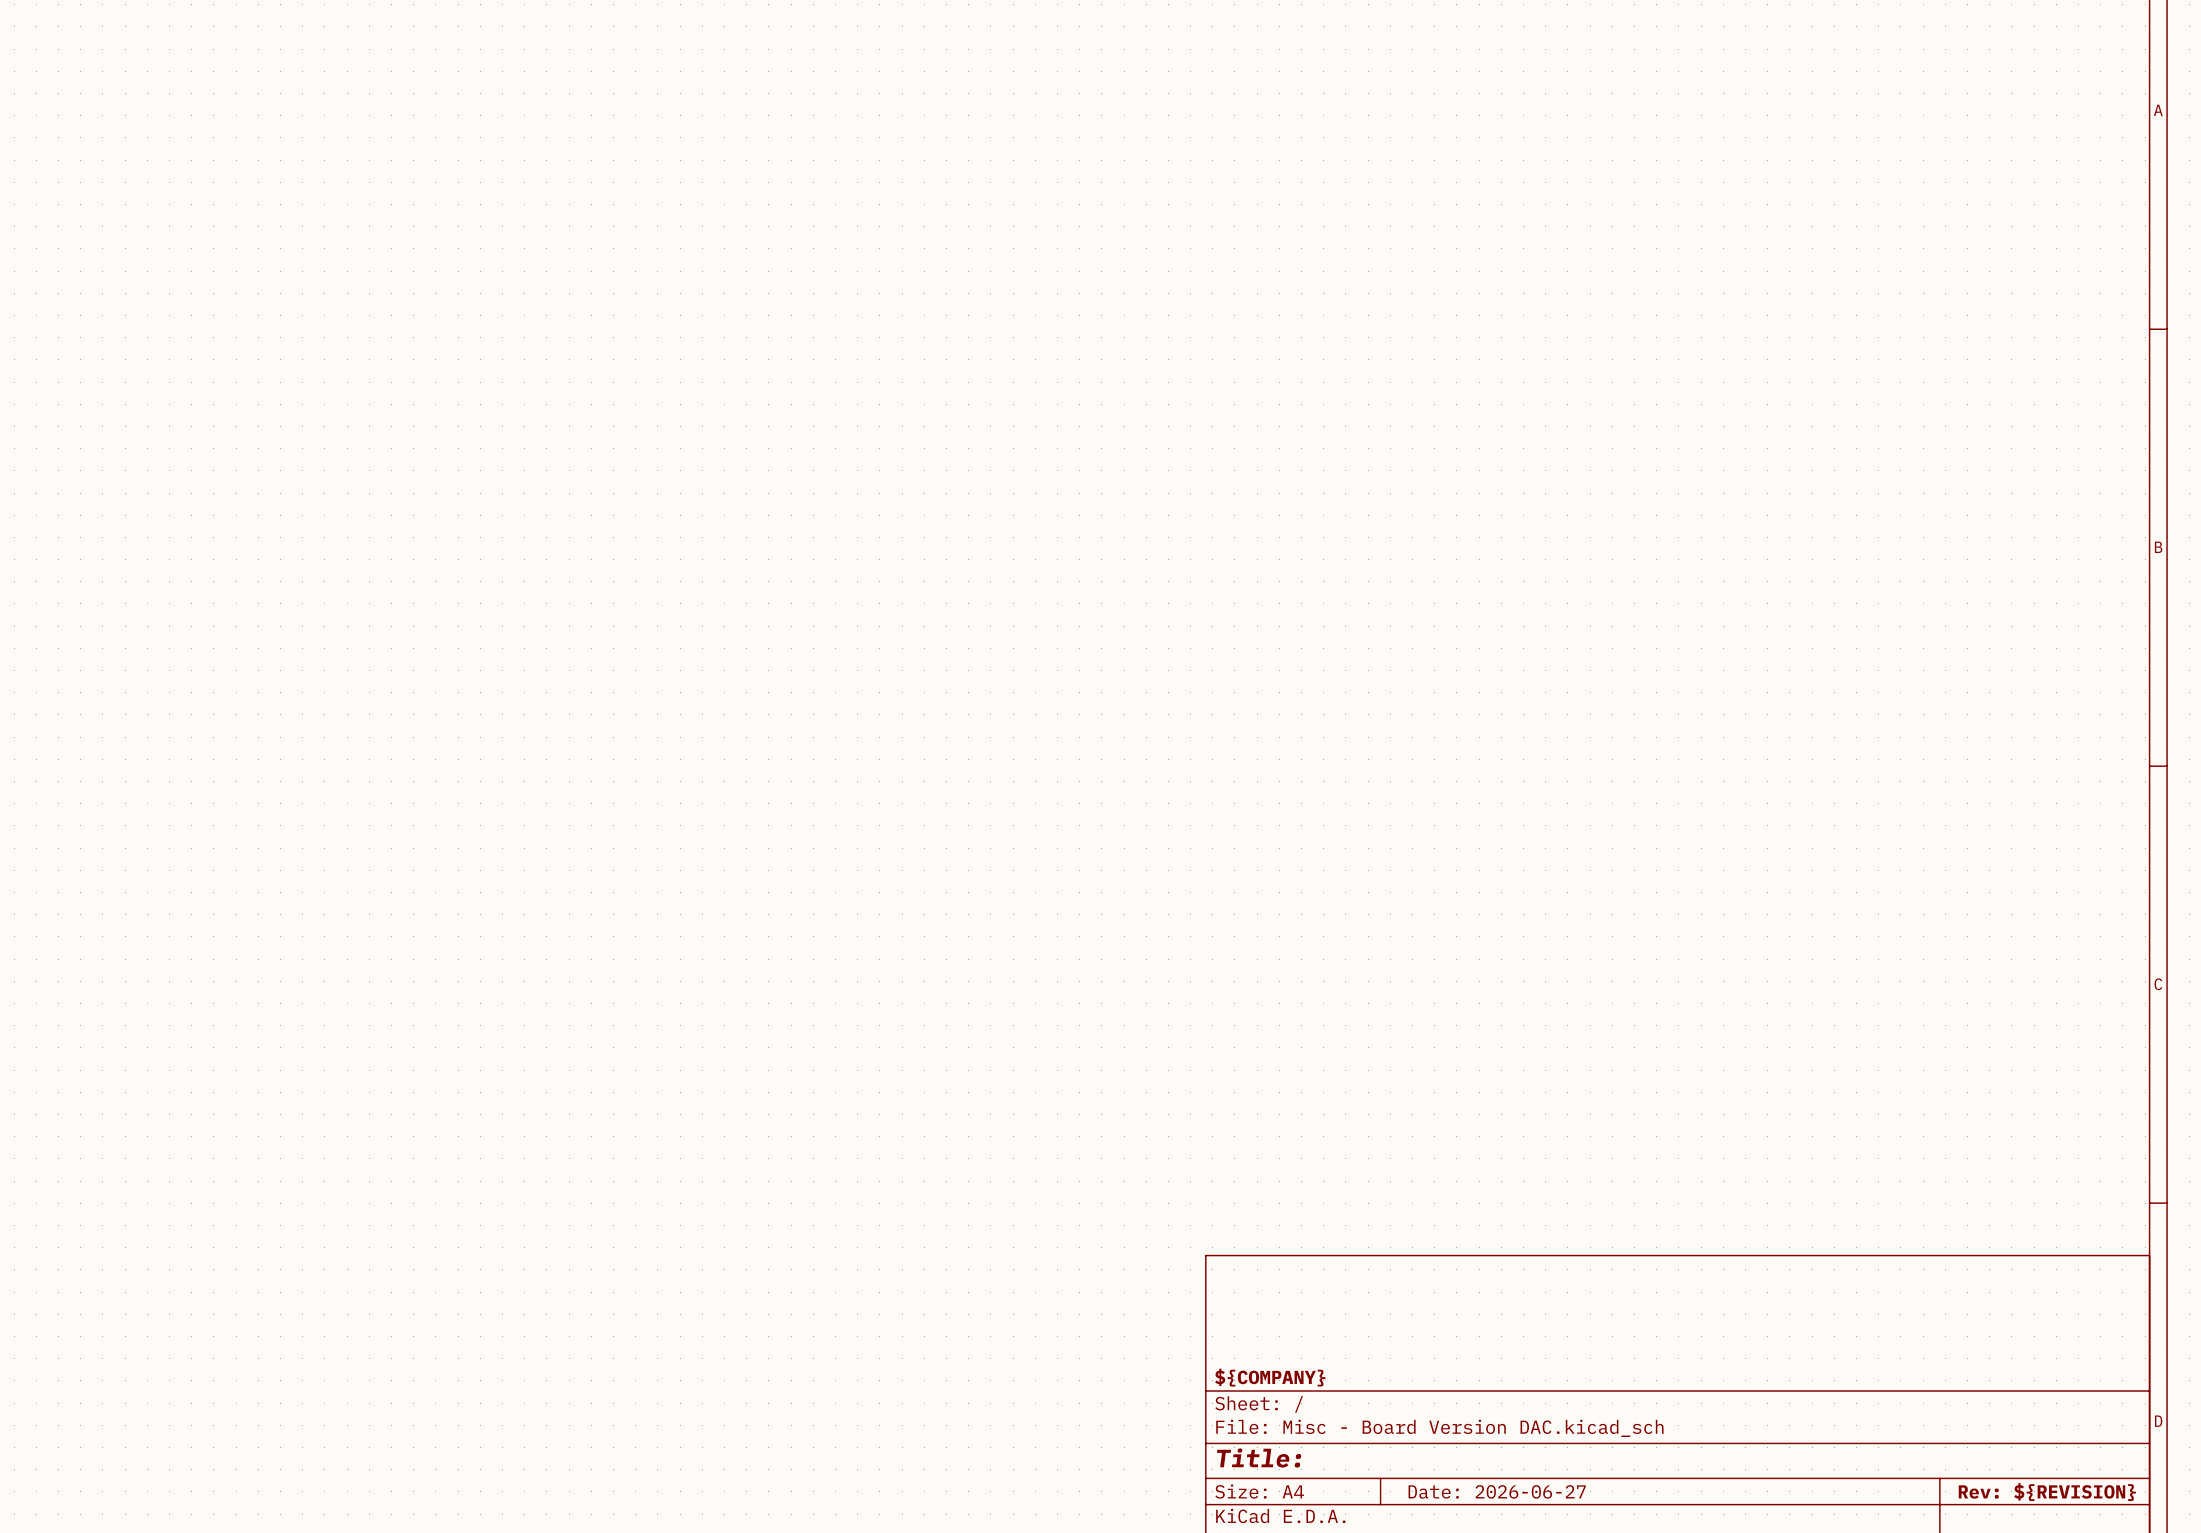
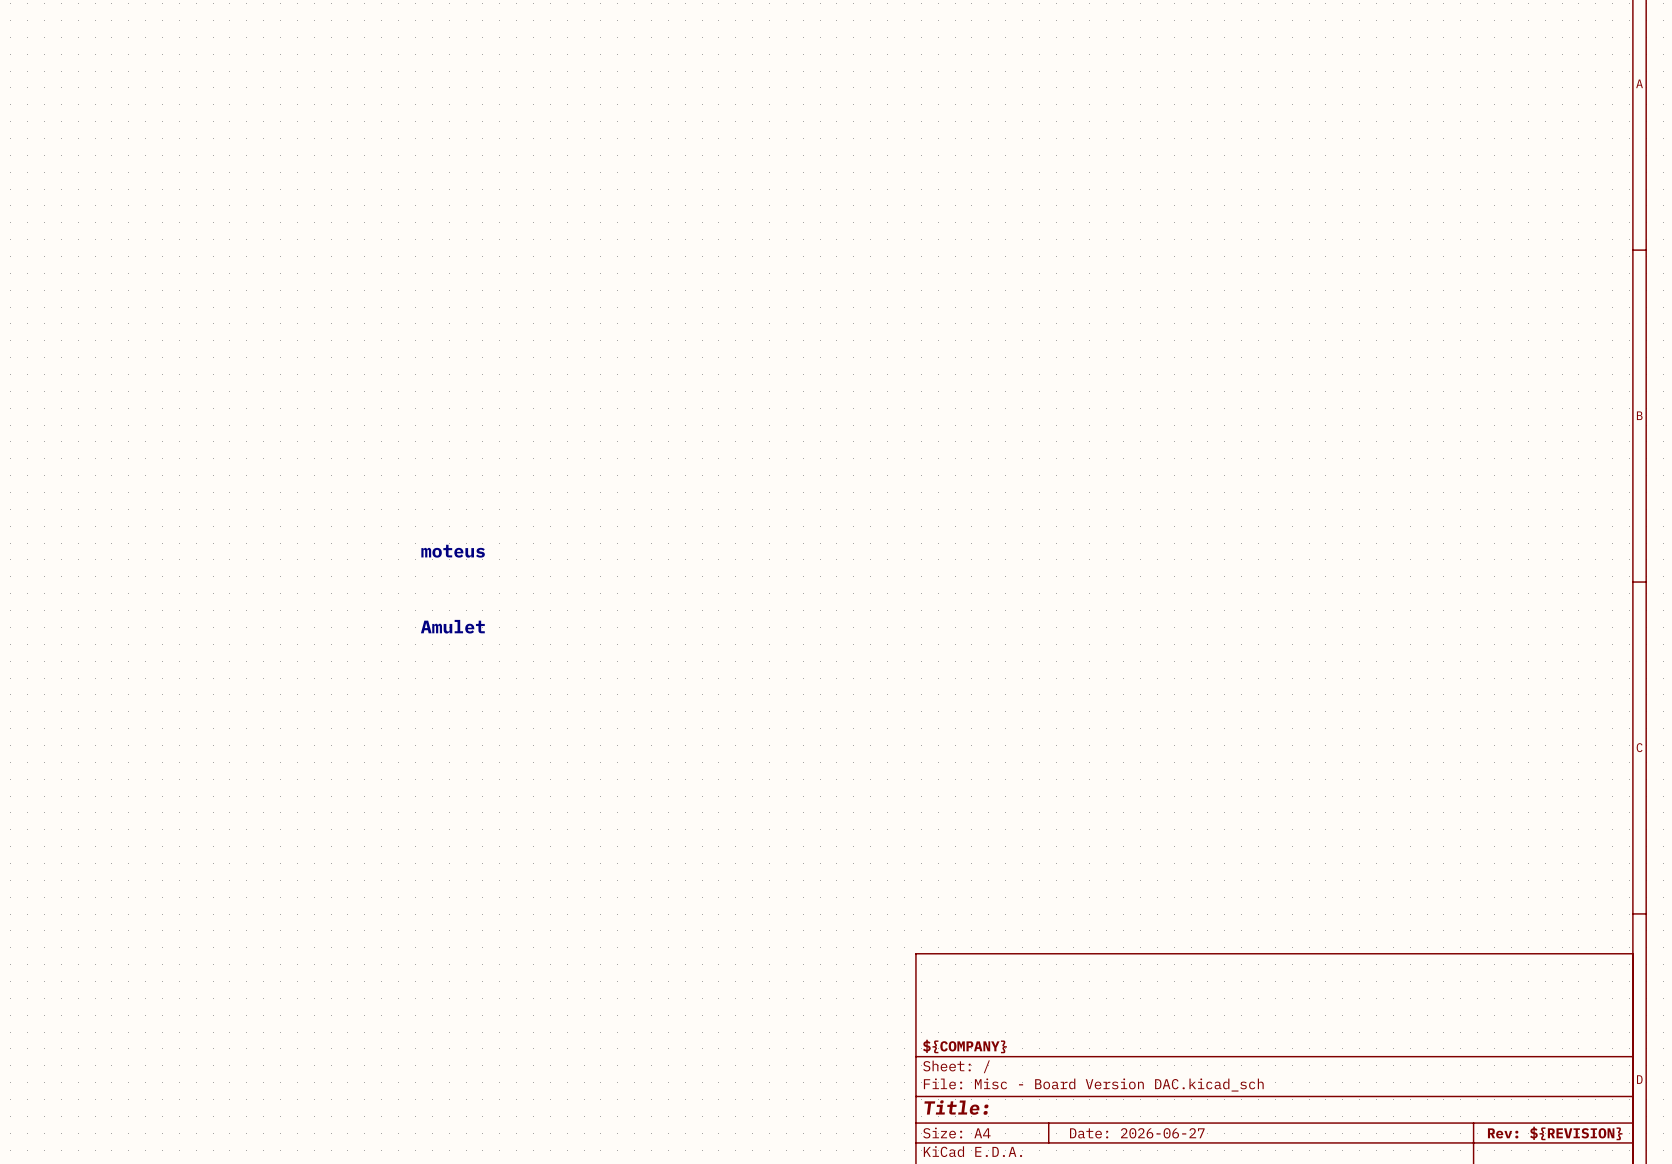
text: none -> moteus (453, 551)
text: none -> Amulet (452, 626)

